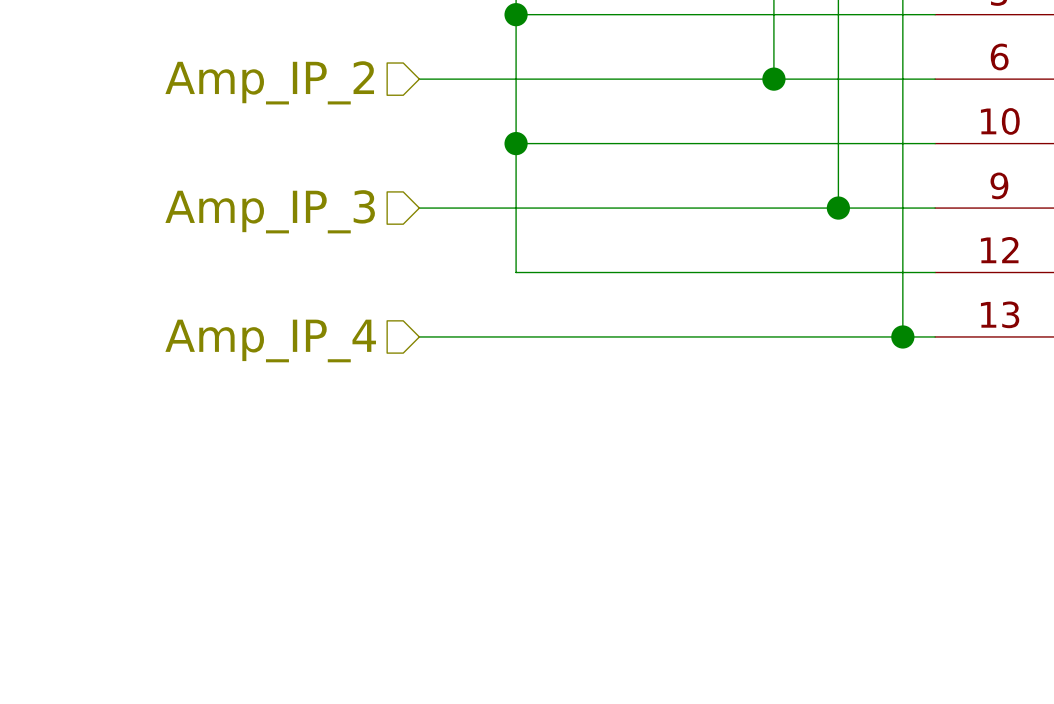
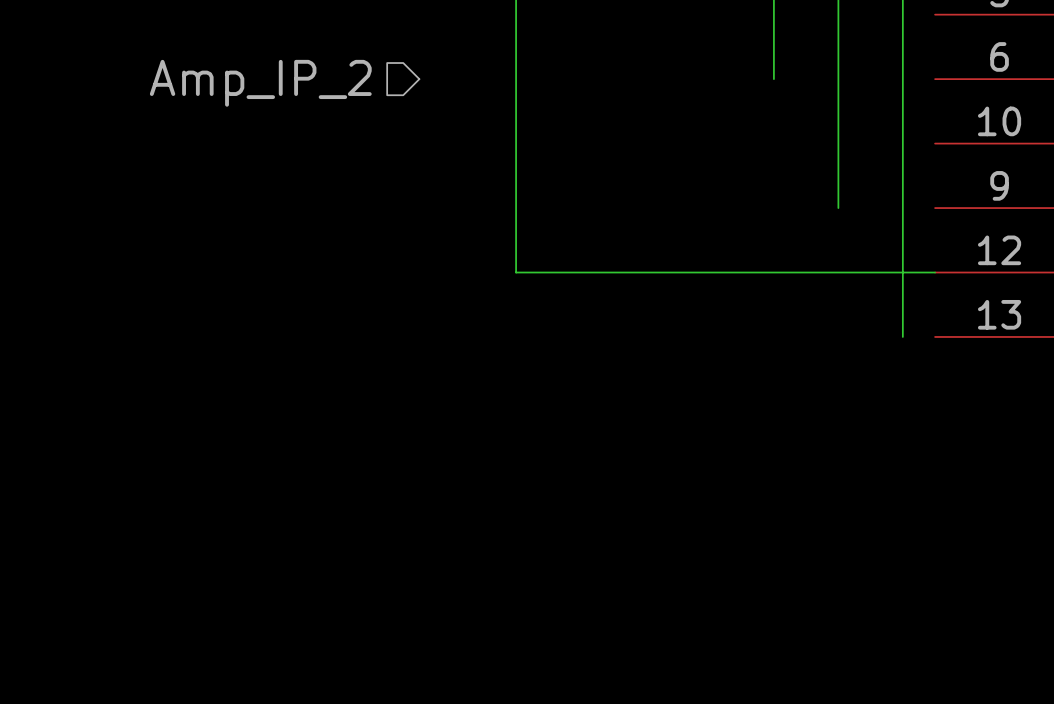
wire: (516, 14) (935, 14) -> none
junction: (516, 14) -> none
wire: (419, 79) (935, 79) -> none
junction: (773, 79) -> none
wire: (516, 143) (935, 143) -> none
junction: (516, 143) -> none
wire: (419, 208) (935, 208) -> none
junction: (838, 208) -> none
hierarchical label: Amp_IP_3 (270, 211) -> none
wire: (419, 336) (935, 336) -> none
junction: (902, 336) -> none
hierarchical label: Amp_IP_4 (270, 340) -> none

